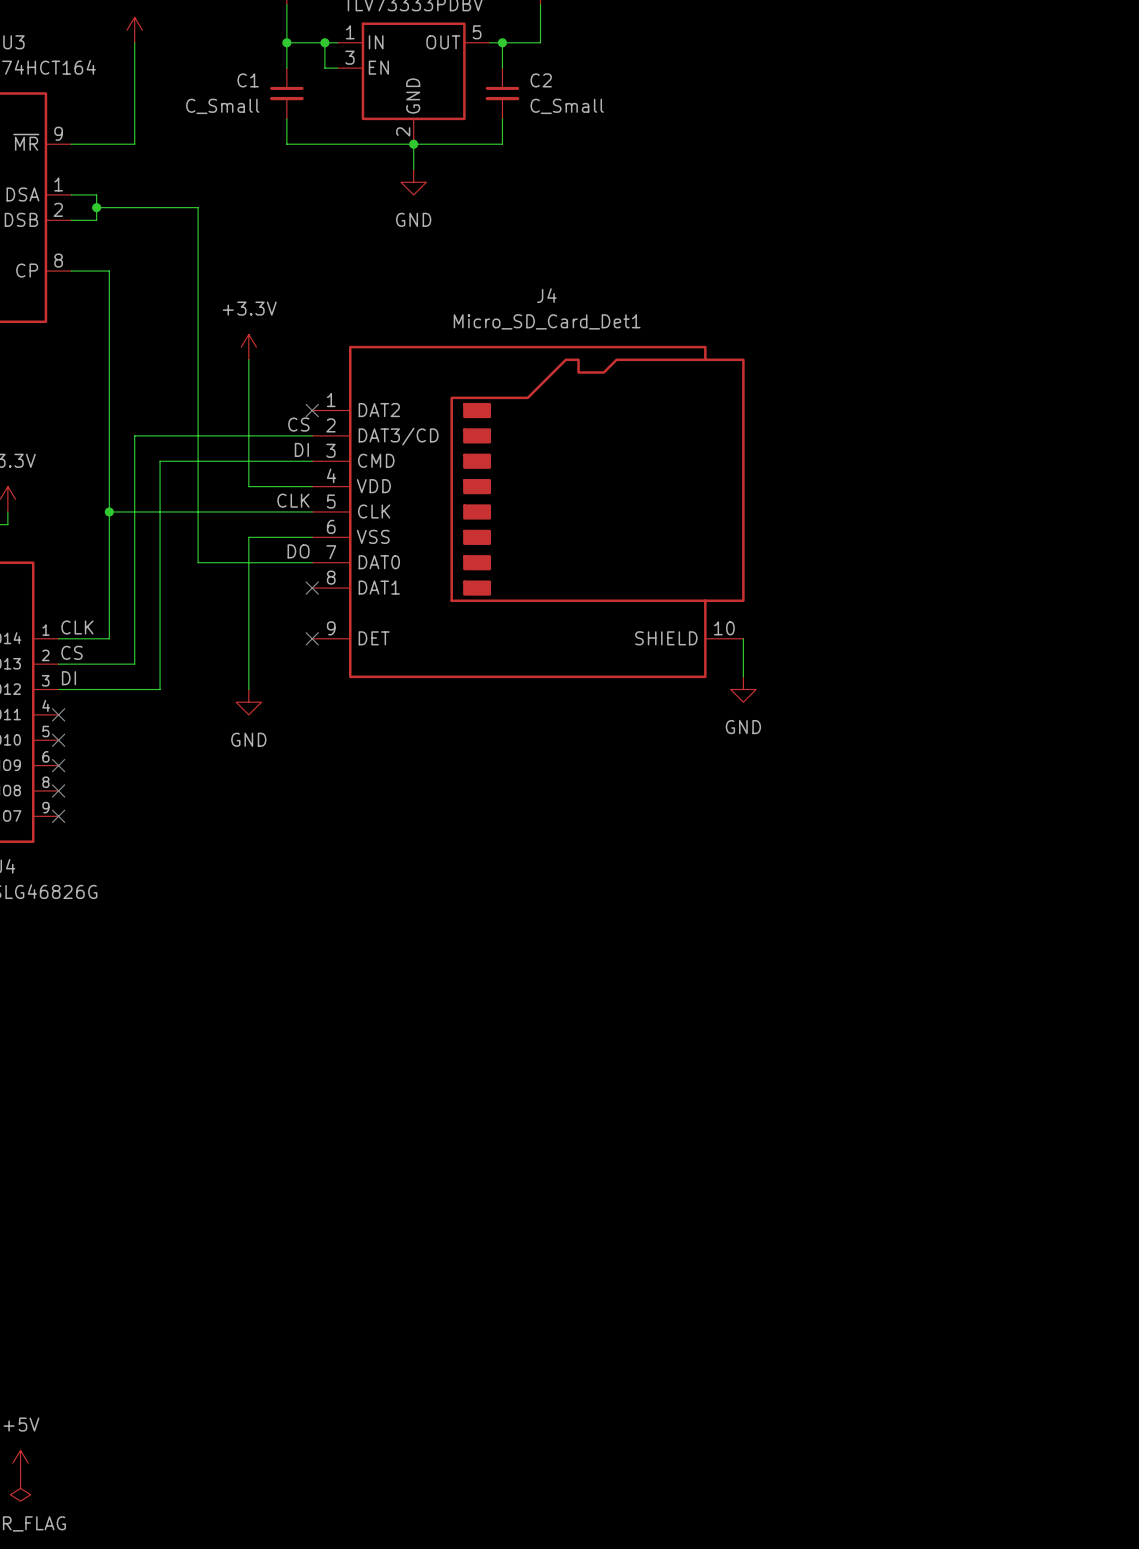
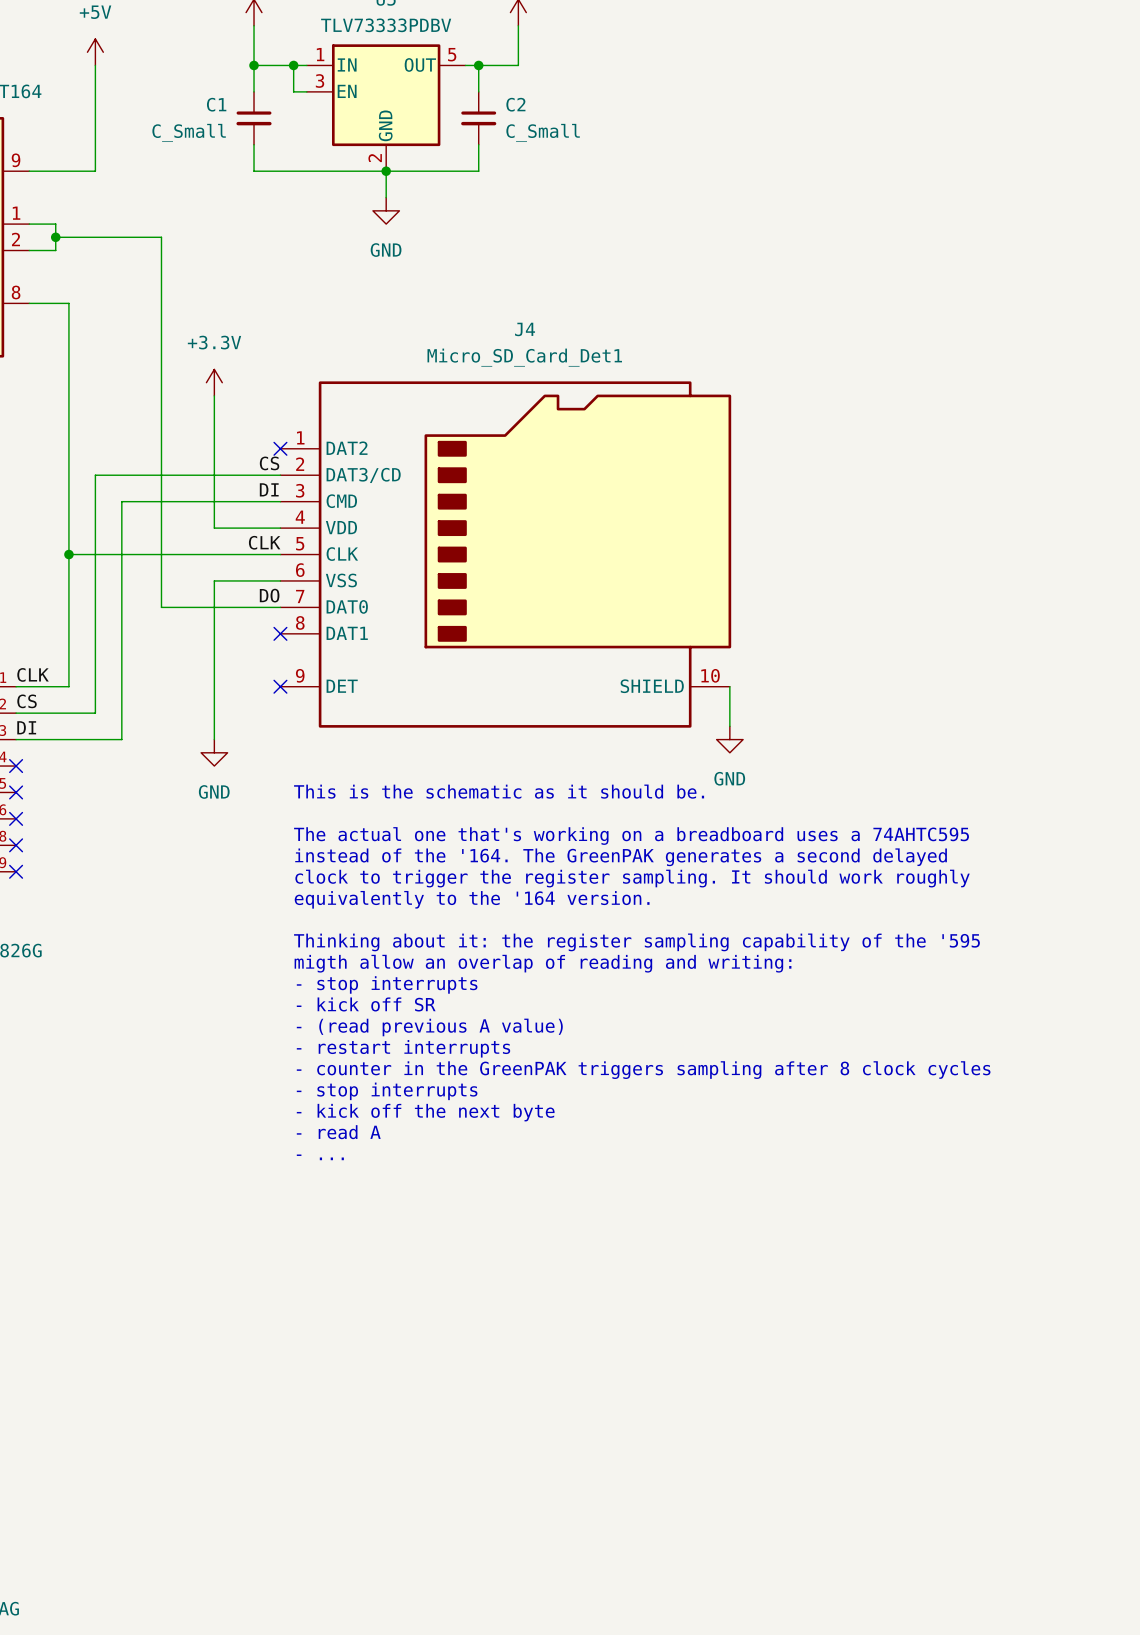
text: none -> This is the schematic as it should be. (499, 791)
text: none -> The actual one that's working on a breadboard uses a 74AHTC595 (631, 835)
text: none -> instead of the '164. The GreenPAK generates a second delayed (621, 857)
text: none -> clock to trigger the register sampling. It should work roughly (632, 878)
text: none -> equivalently to the '164 version. (472, 899)
text: none -> Thinking about it: the register sampling capability of the '595 (636, 942)
text: none -> migth allow an overlap of reading and writing: (543, 963)
text: none -> - stop interrupts (387, 984)
text: none -> - kick off SR (366, 1004)
text: none -> - (read previous A value) (429, 1027)
text: none -> - restart interrupts (403, 1048)
text: none -> - counter in the GreenPAK triggers sampling after 8 clock cycles (643, 1070)
text: none -> - stop interrupts (387, 1091)
text: none -> - kick off the next byte (425, 1112)
text: none -> - read A (338, 1132)
text: none -> - ... (320, 1157)

